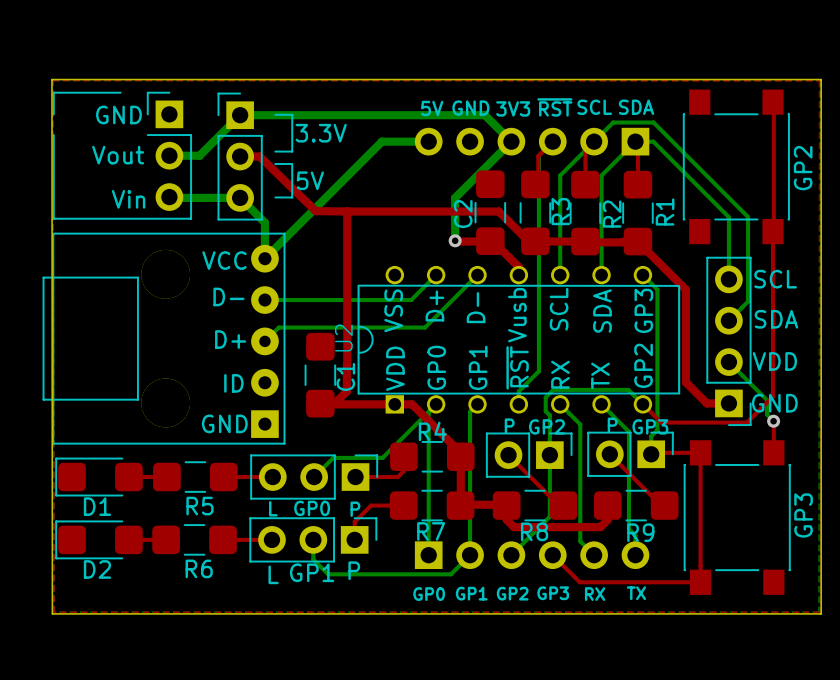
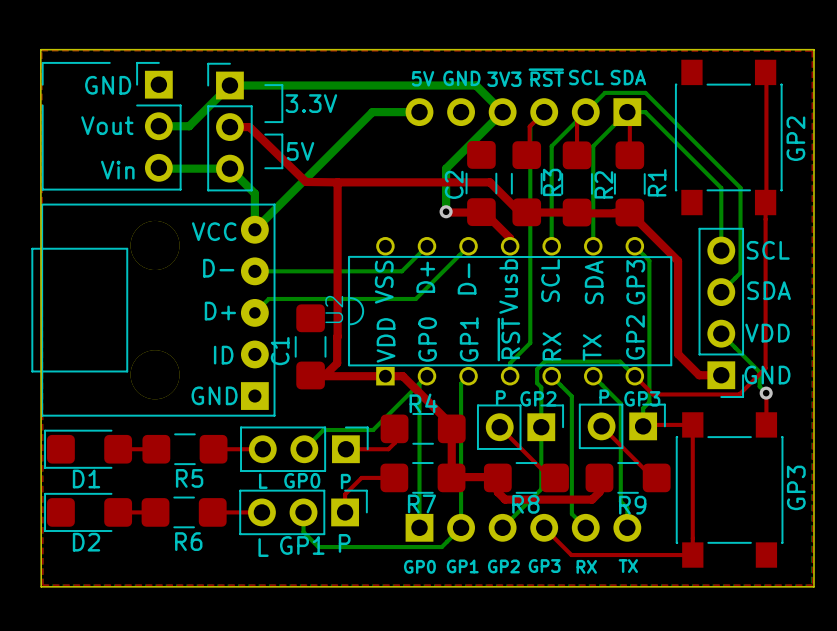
C1 name position: C1 (345, 376) -> C1 (280, 351)

